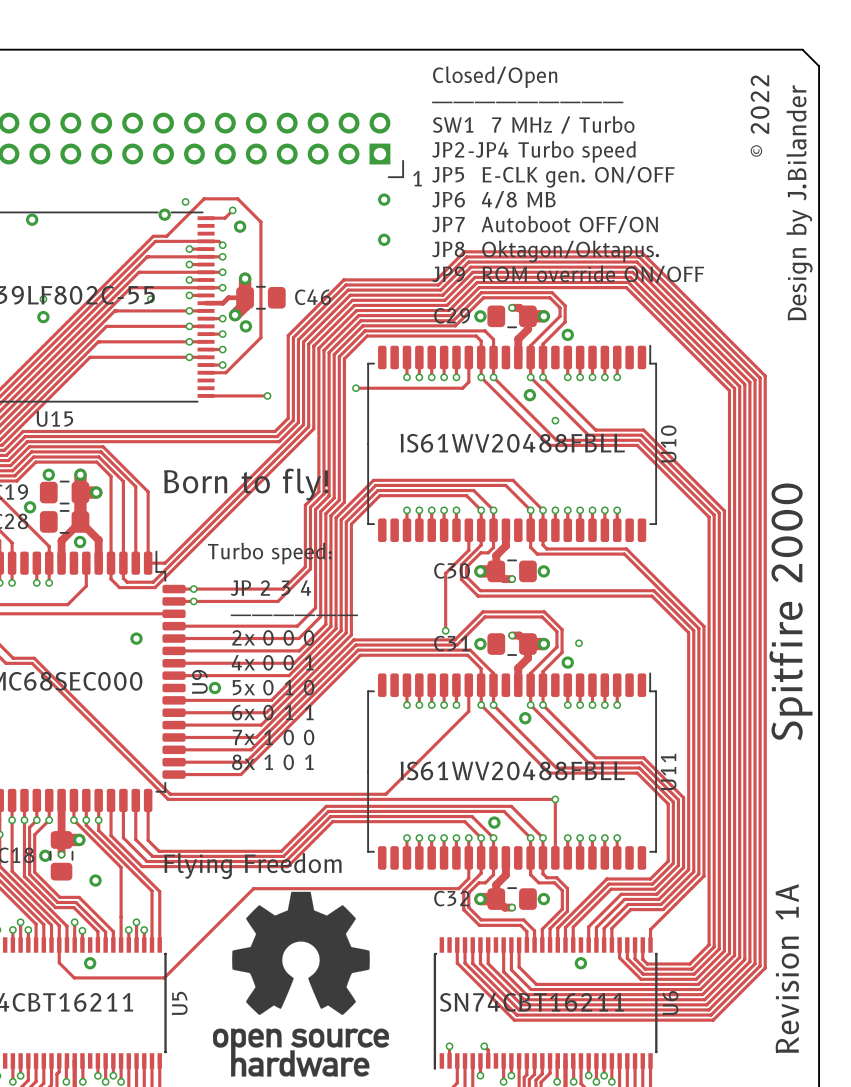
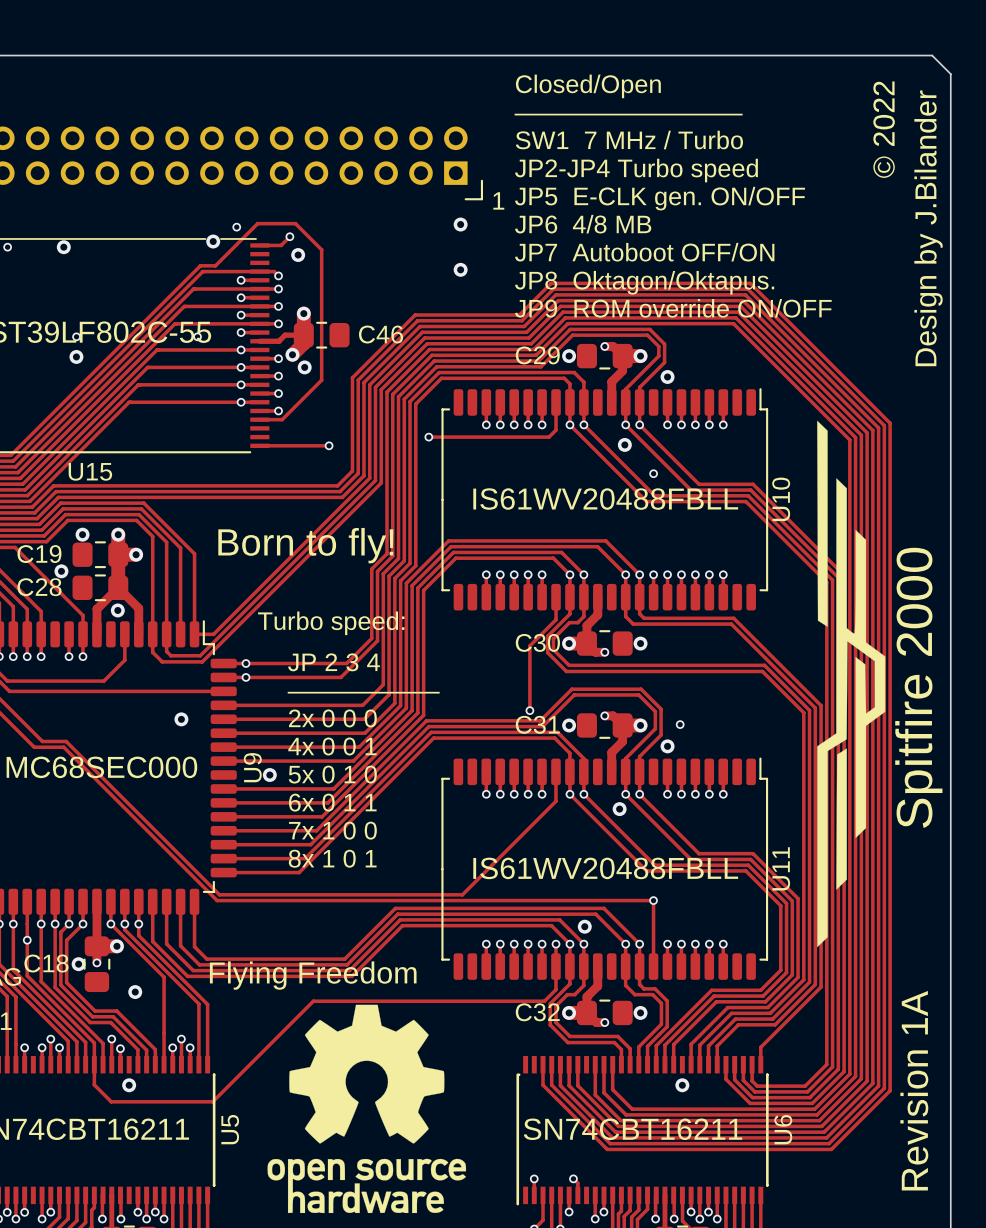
drawing: none -> [817, 420, 886, 948]

